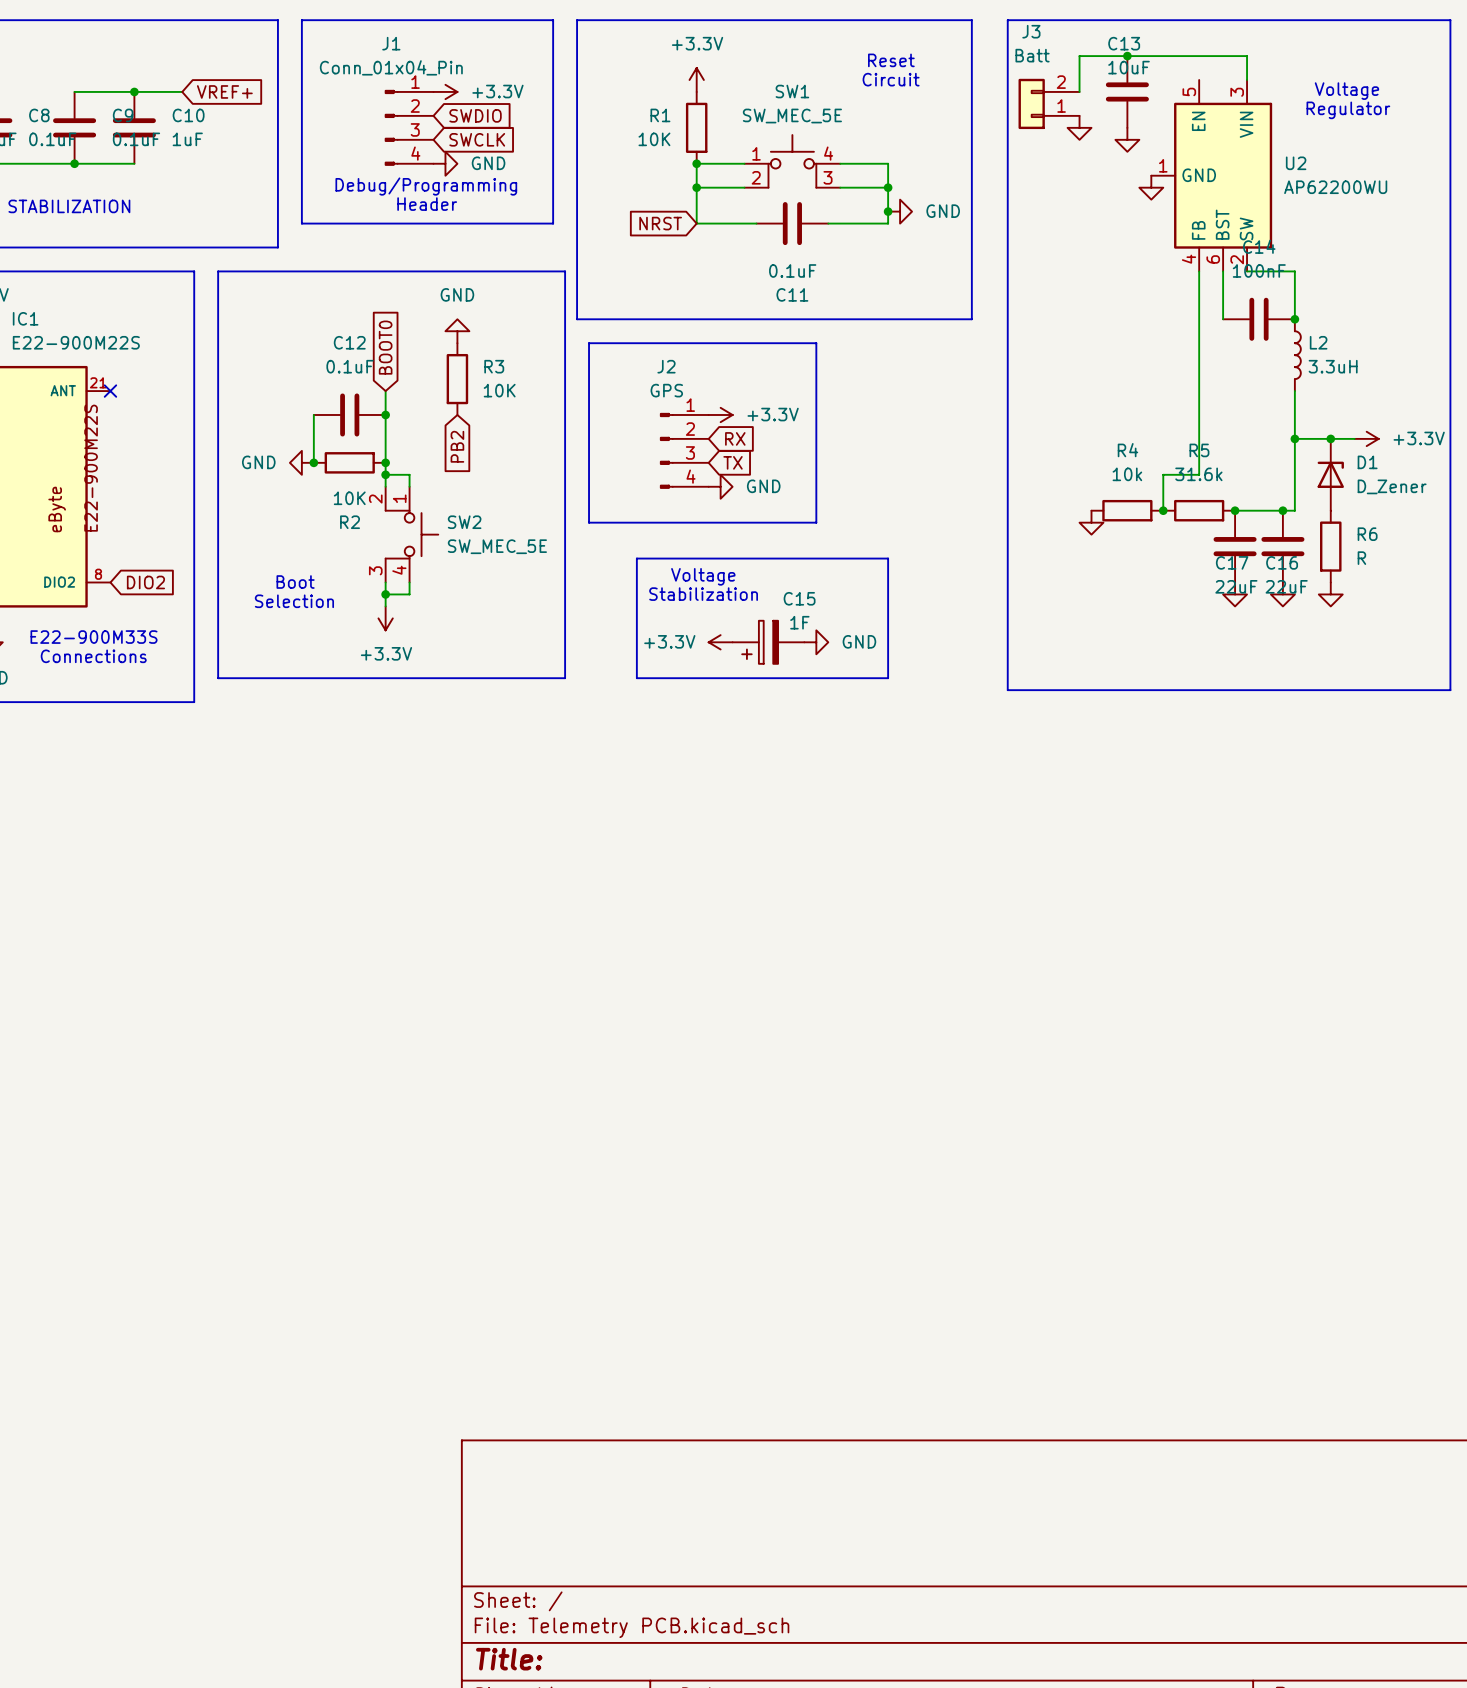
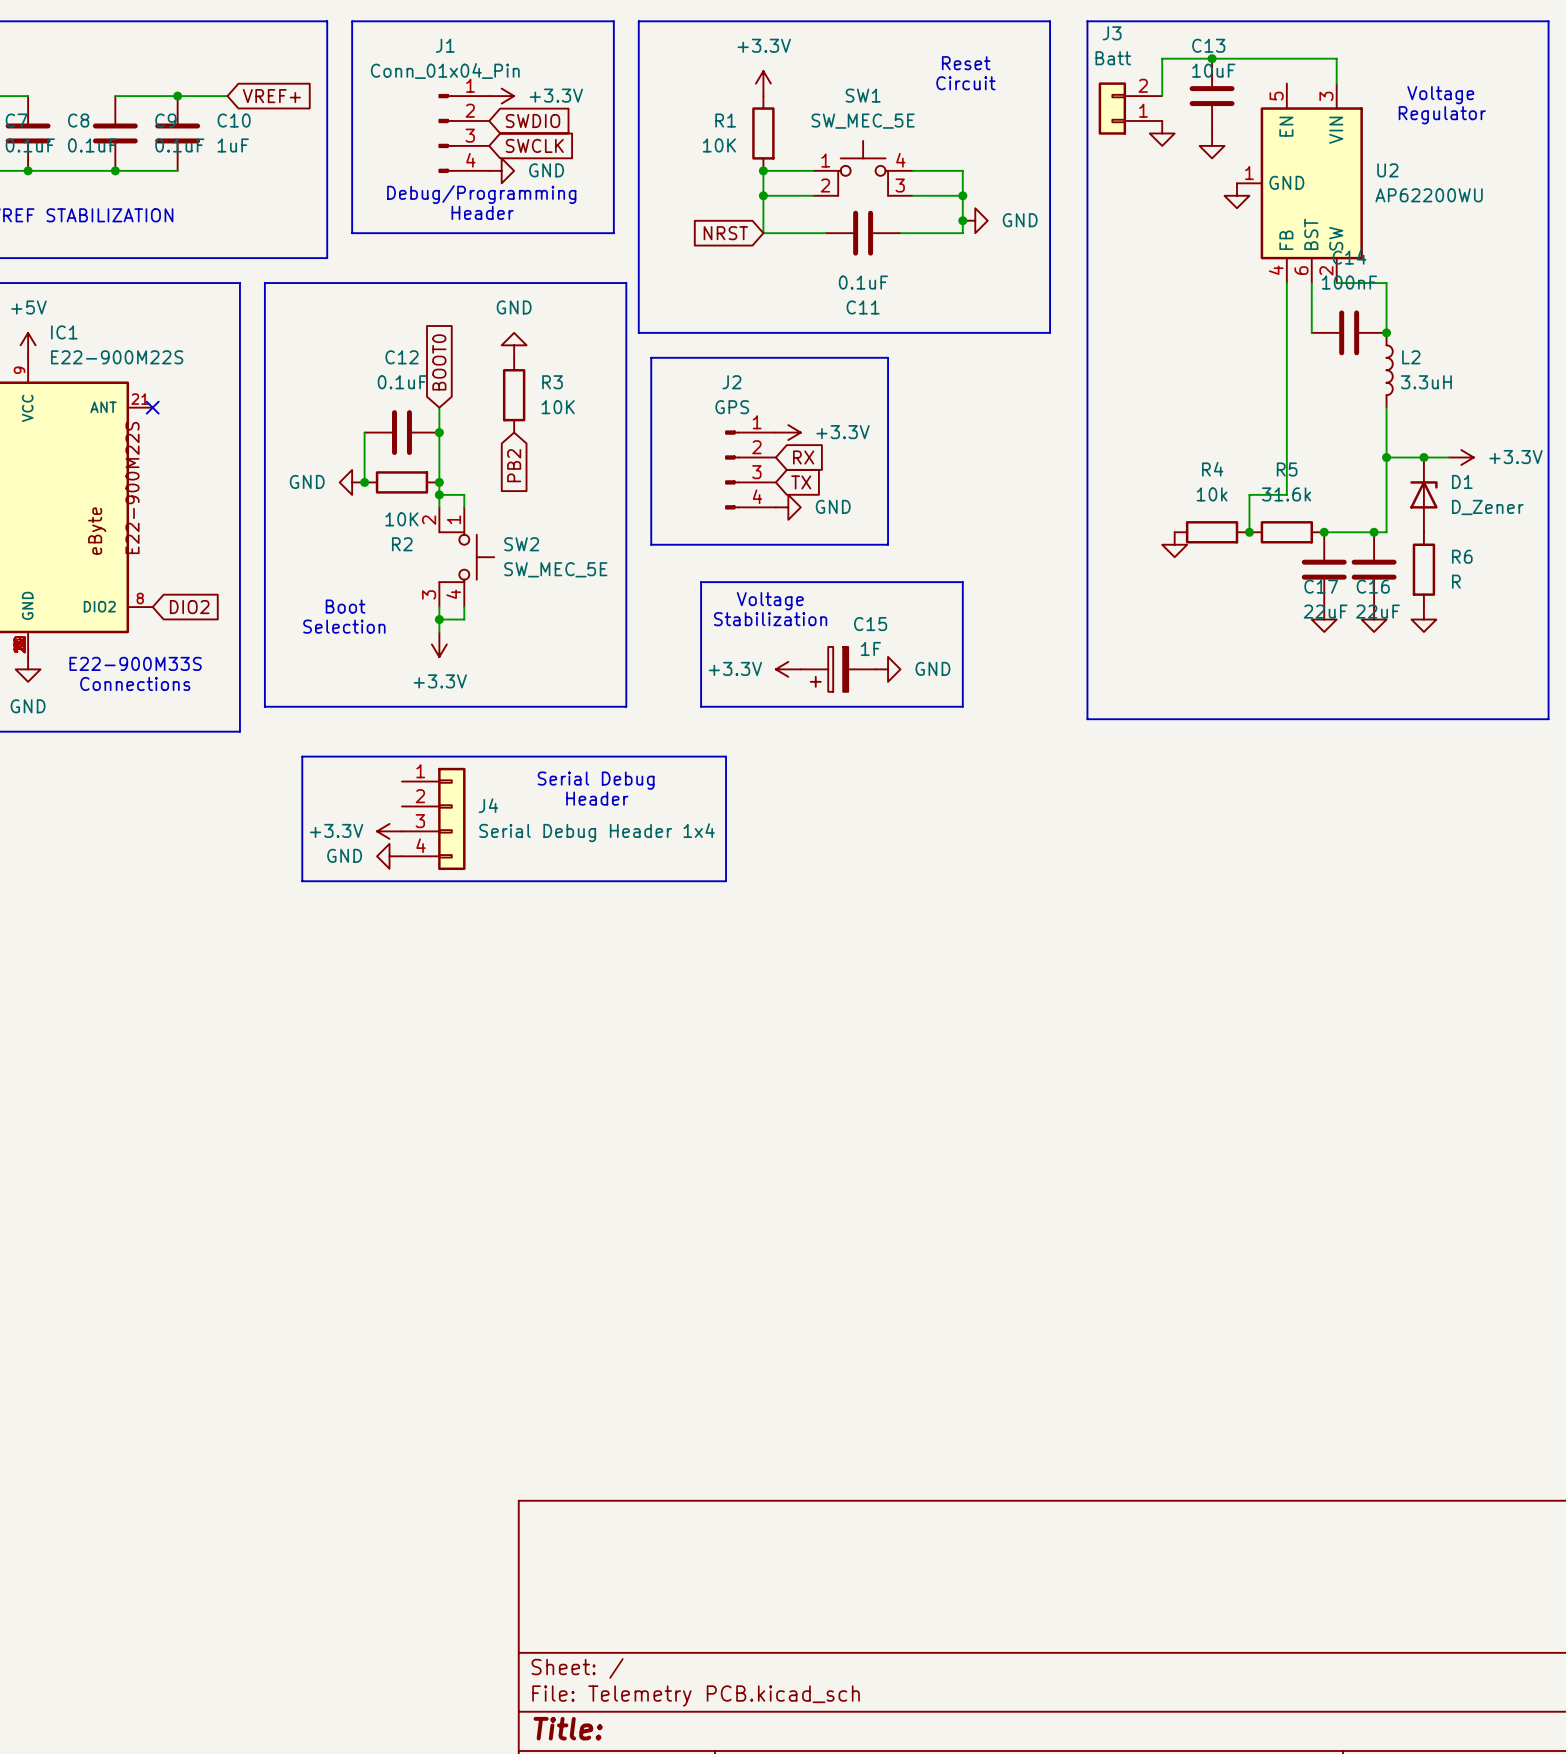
line: none -> (302, 756) (726, 756) (726, 881) (302, 881) (302, 756)
text: none -> Serial Debug (596, 780)
text: none -> Header (597, 798)
J4: none -> Serial Debug Header 1x4 (433, 818)
power symbol: none -> +3.3V (389, 831)
power symbol: none -> GND (389, 856)

